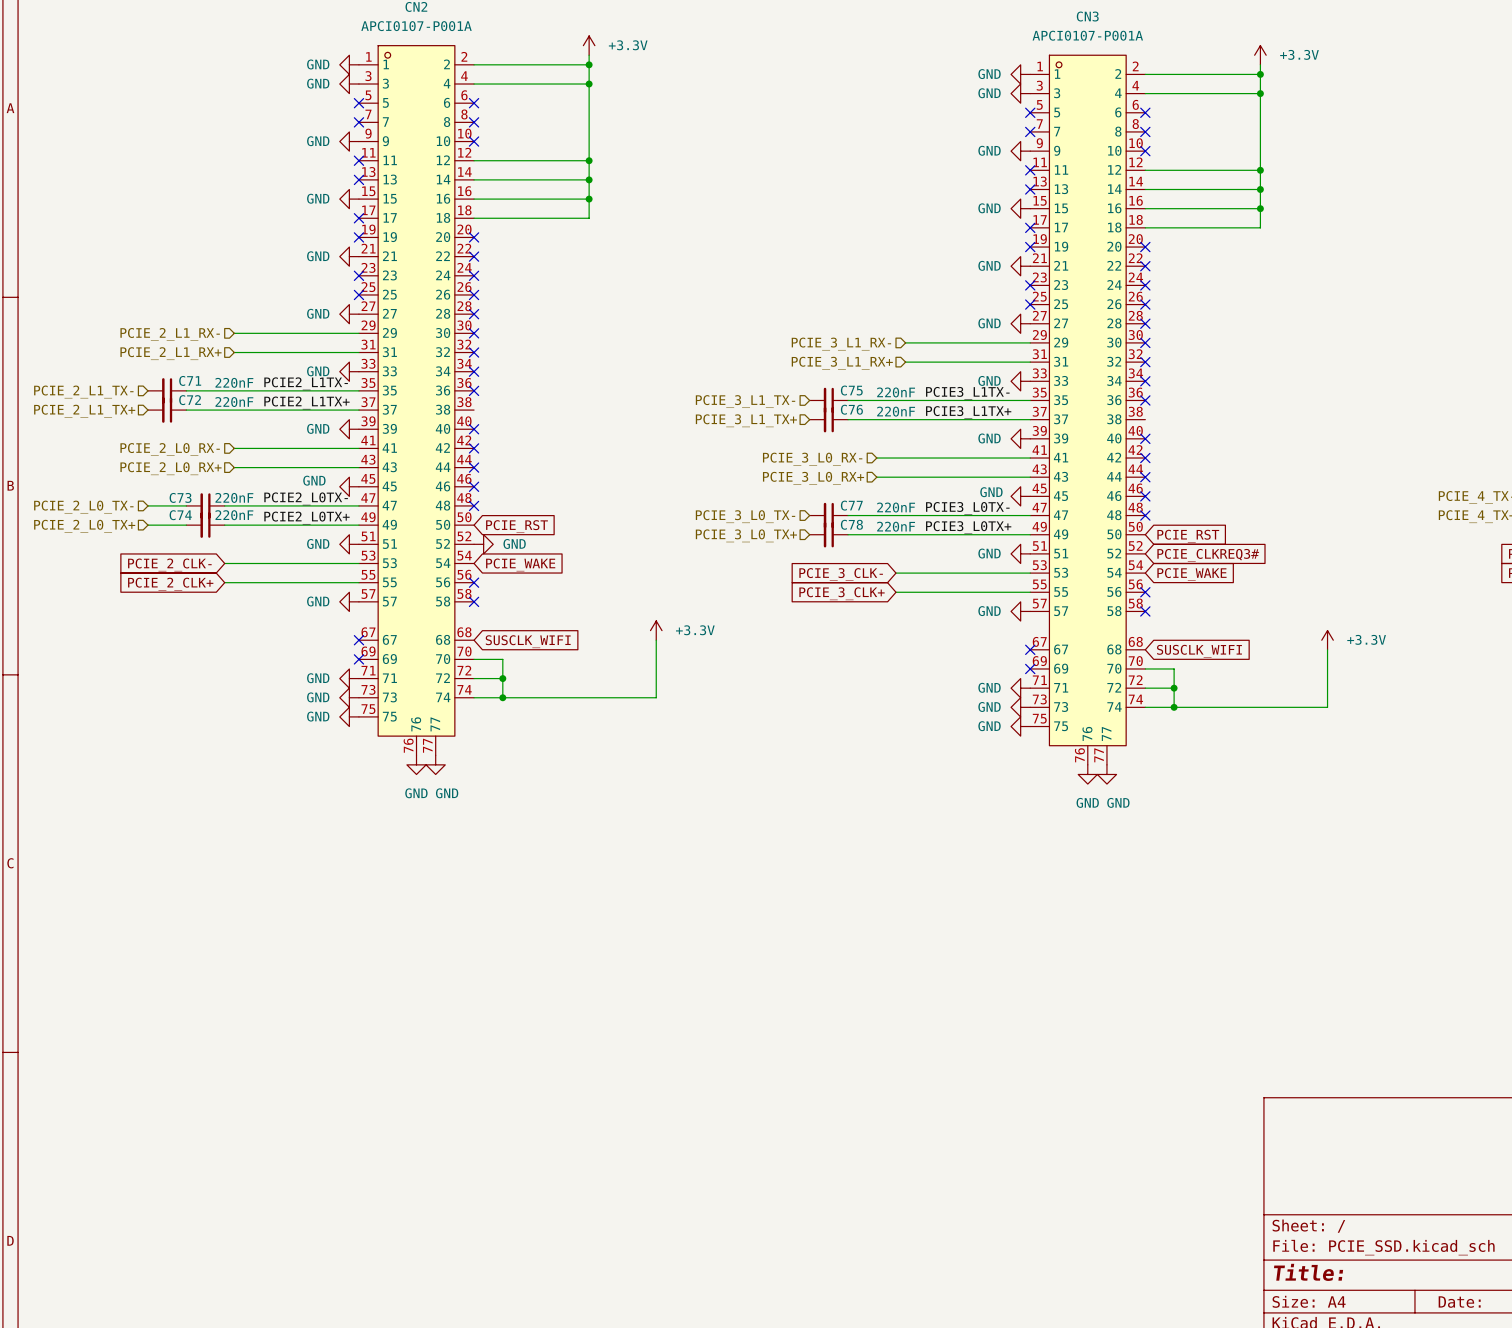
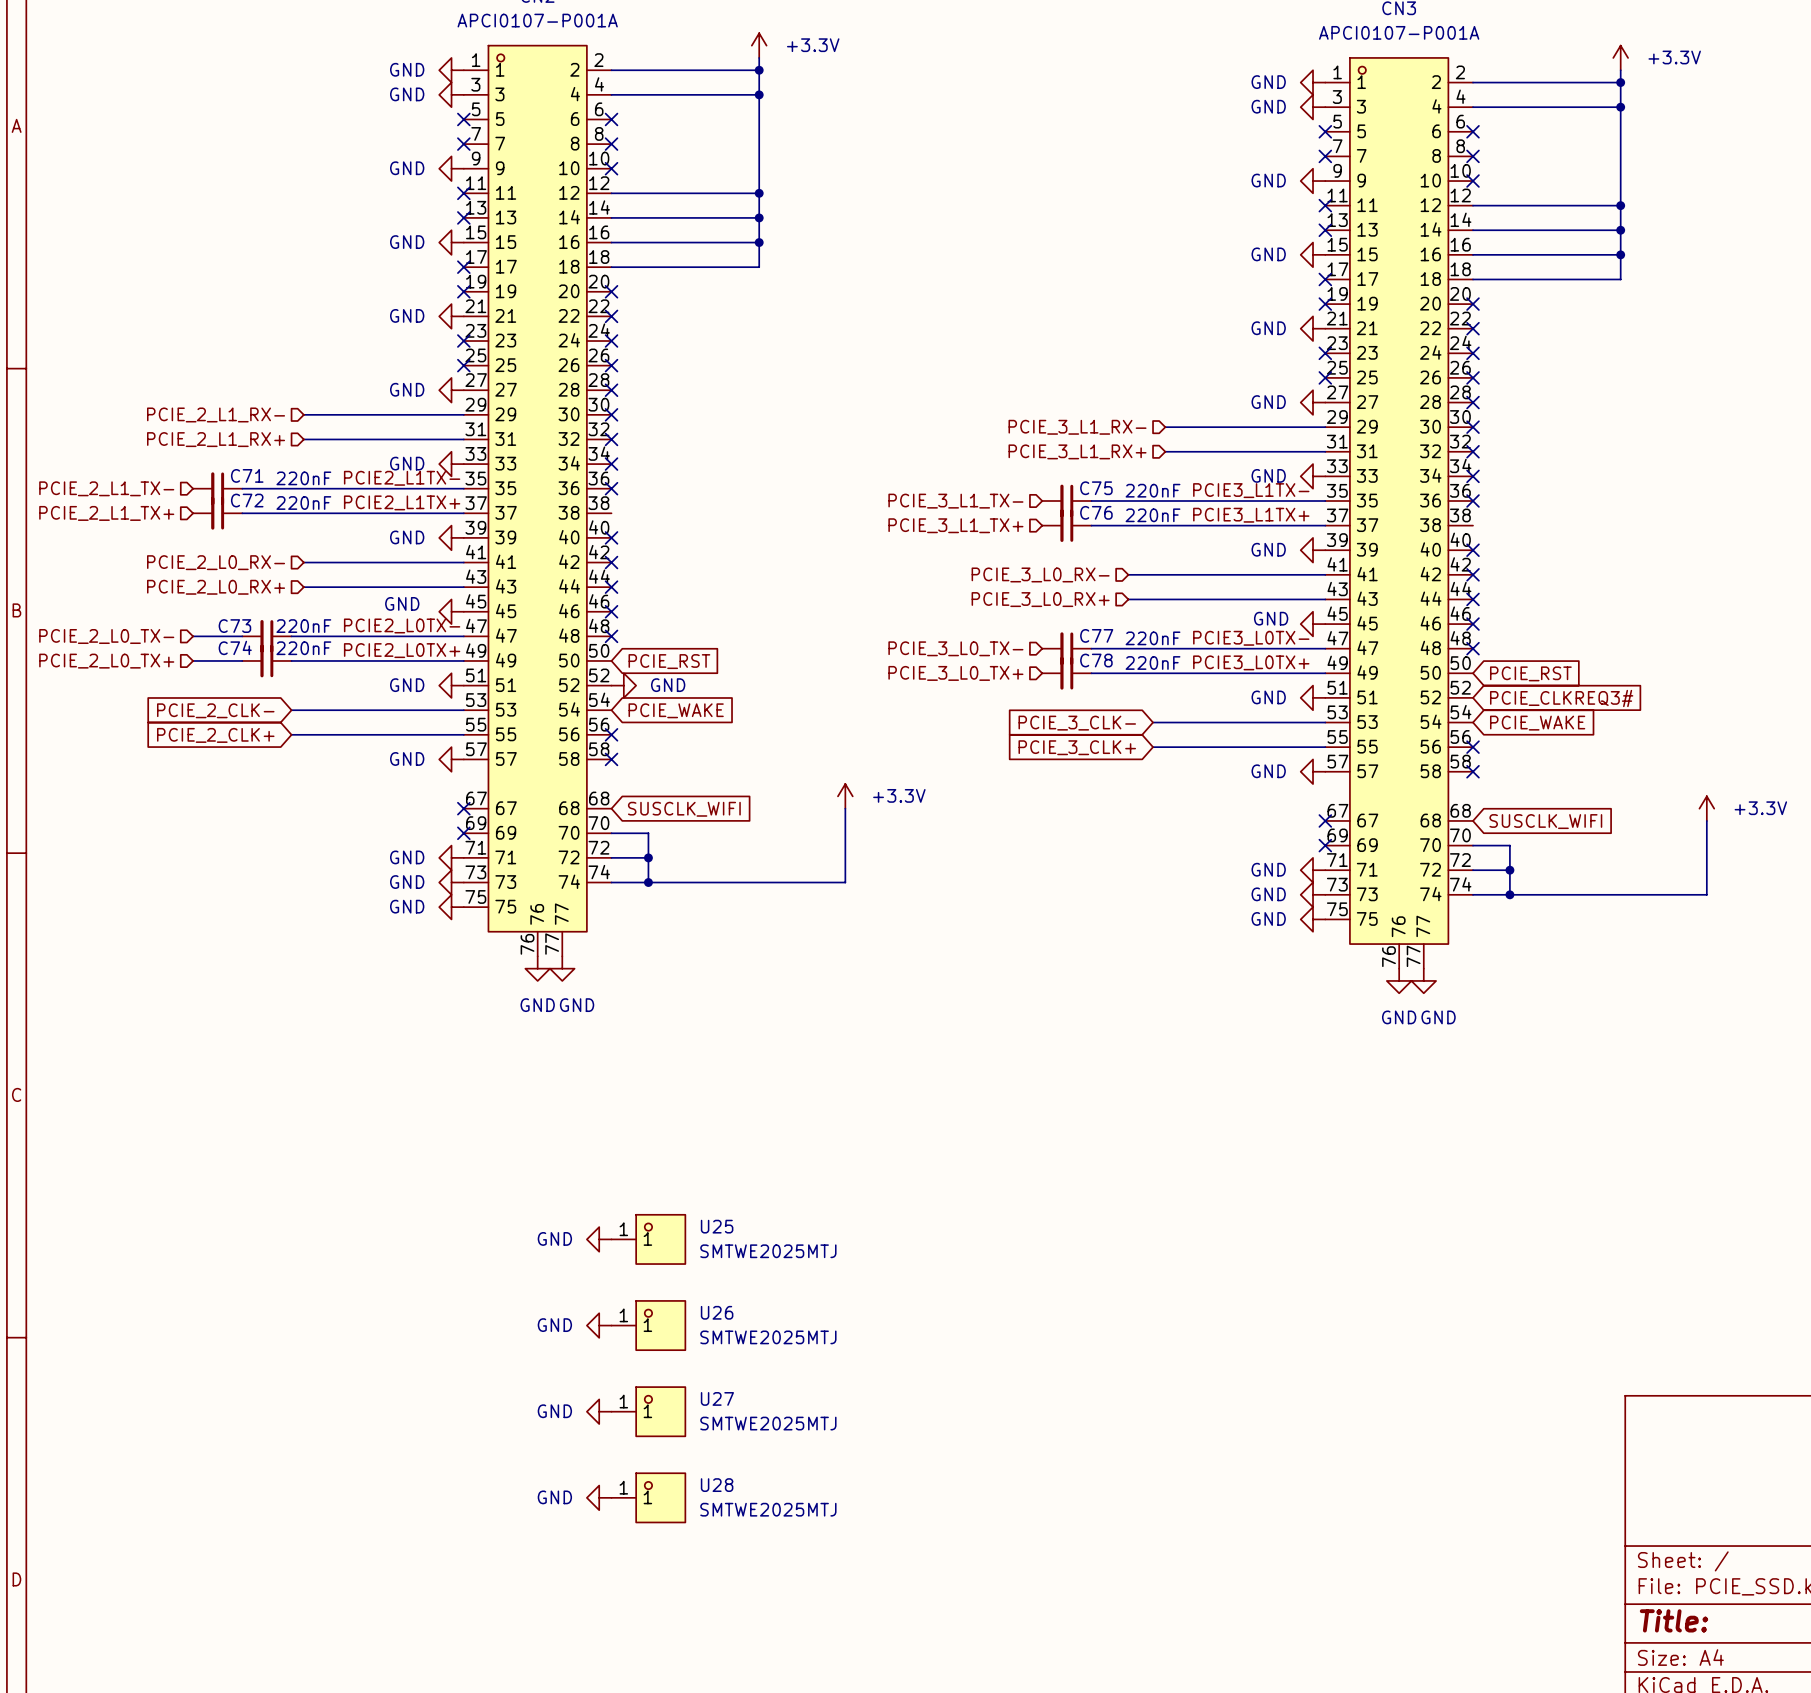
power symbol: none -> GND (599, 1239)
U25: none -> SMTWE2025MTJ (648, 1239)
power symbol: none -> GND (599, 1325)
U26: none -> SMTWE2025MTJ (648, 1325)
power symbol: none -> GND (599, 1411)
U27: none -> SMTWE2025MTJ (648, 1411)
power symbol: none -> GND (599, 1497)
U28: none -> SMTWE2025MTJ (648, 1497)

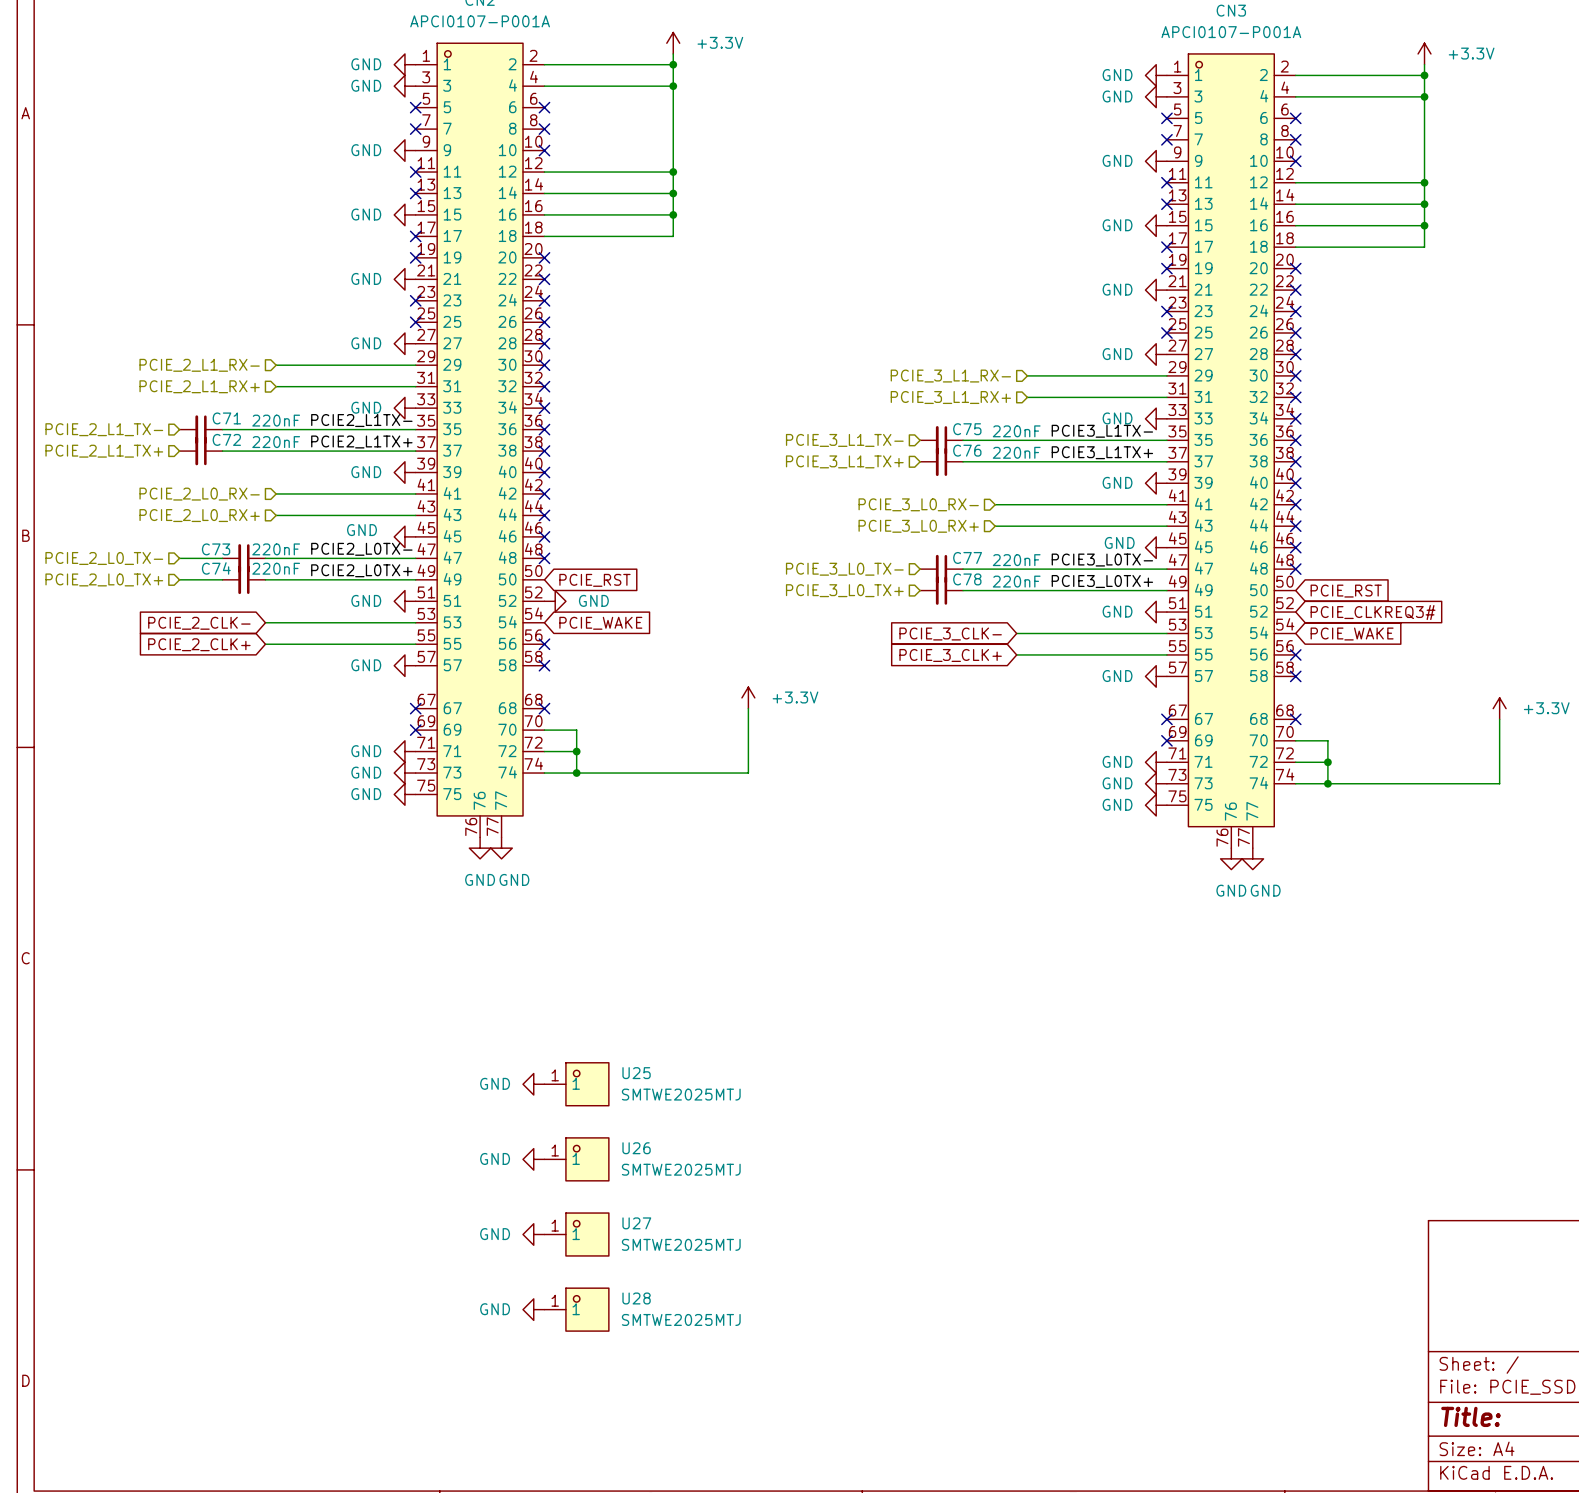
no-connect mark: none -> (544, 451)
no-connect mark: none -> (1295, 461)
no-connect mark: none -> (544, 708)
global label: SUSCLK_WIFI (684, 809) -> none
no-connect mark: none -> (1295, 719)
global label: SUSCLK_WIFI (1545, 821) -> none

